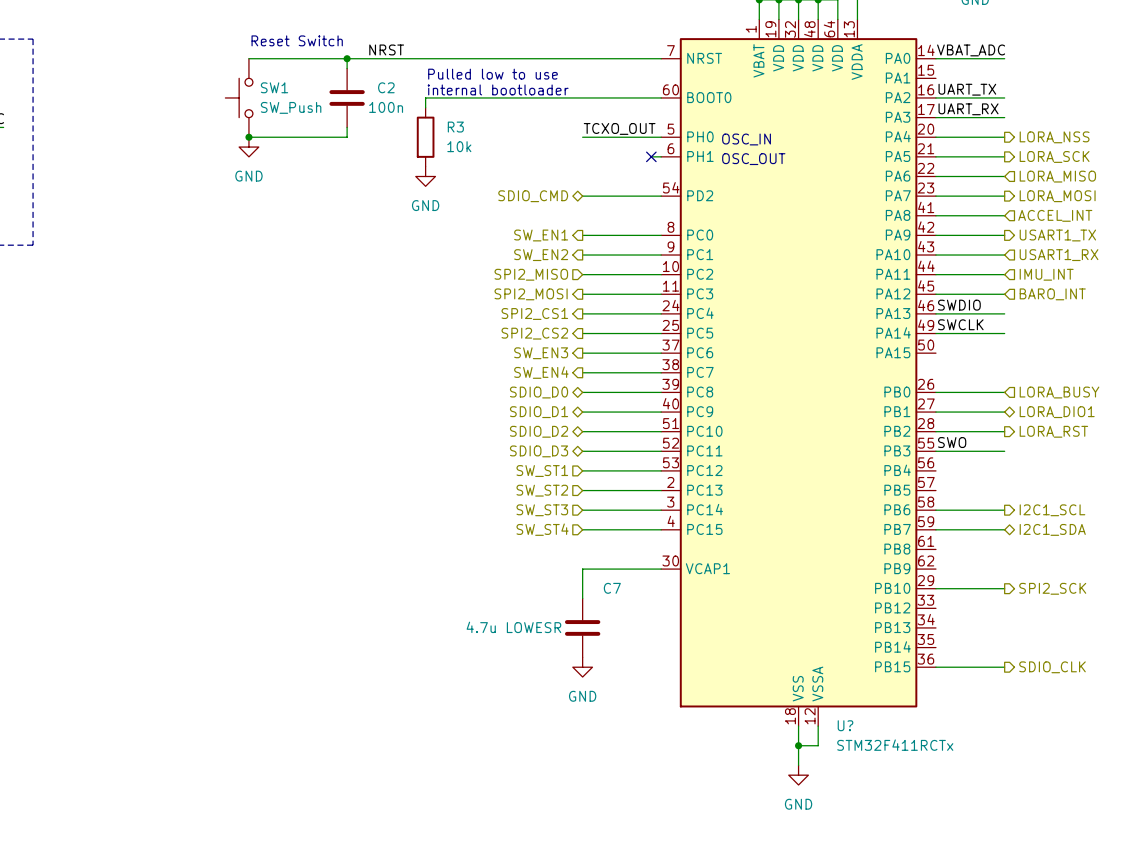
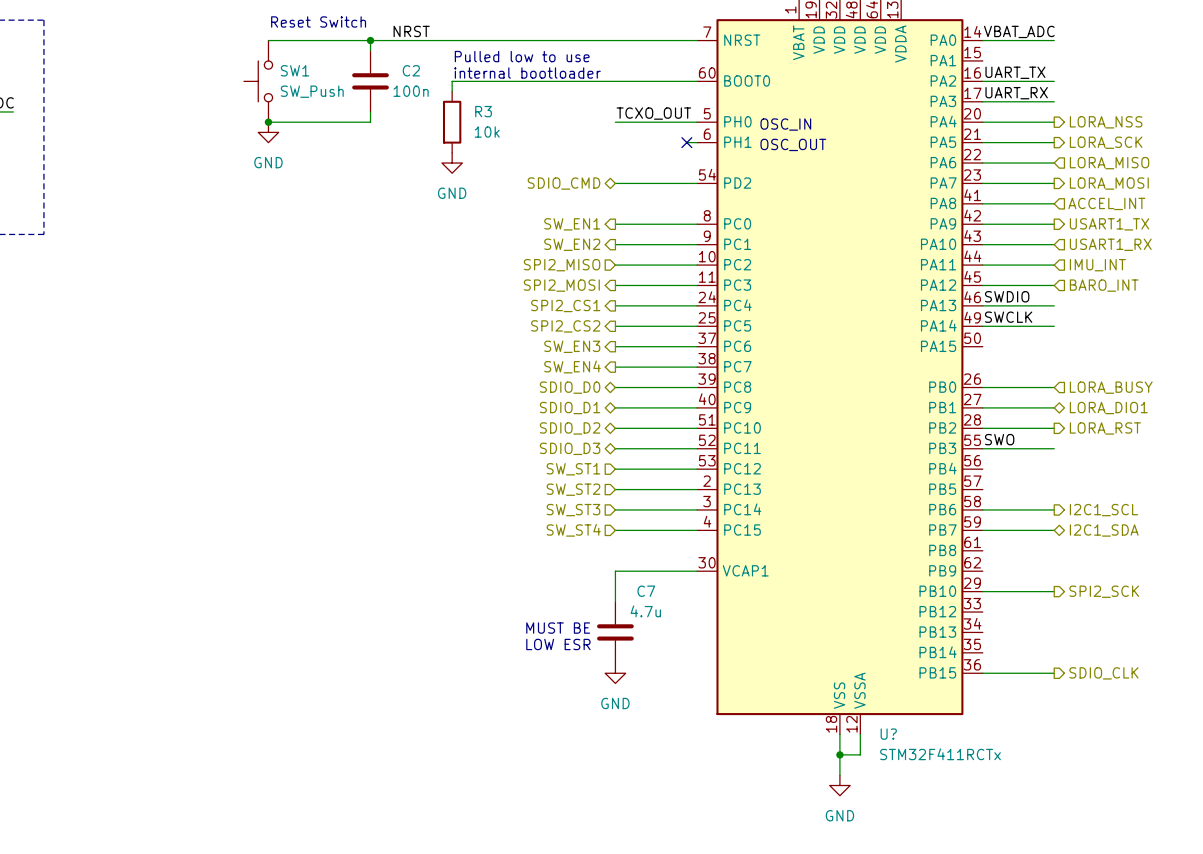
text: none -> MUST BE (558, 628)
C7 value: 4.7u LOWESR (513, 627) -> 4.7u (645, 611)
text: none -> LOW ESR (558, 644)

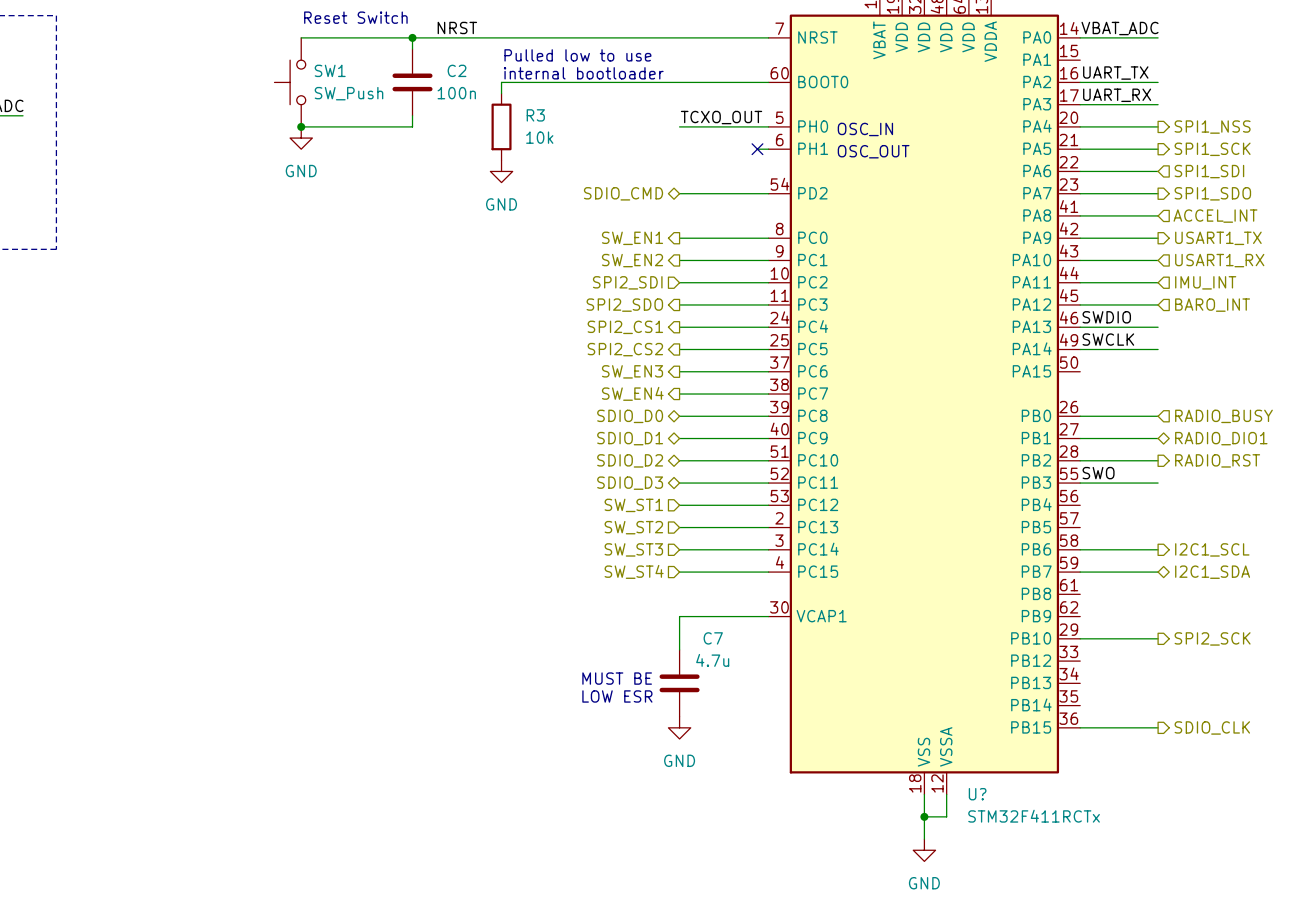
hierarchical label: LORA_NSS (1106, 122) -> SPI1_NSS (1212, 127)
hierarchical label: LORA_SCK (1106, 142) -> SPI1_SCK (1212, 149)
hierarchical label: LORA_MISO (1109, 163) -> SPI1_SDI (1209, 171)
hierarchical label: LORA_MOSI (1109, 183) -> SPI1_SDO (1212, 193)
hierarchical label: SPI2_MISO (562, 265) -> SPI2_SDI (627, 282)
hierarchical label: SPI2_MOSI (561, 285) -> SPI2_SDO (624, 305)
hierarchical label: LORA_BUSY (1111, 387) -> RADIO_BUSY (1223, 416)
hierarchical label: LORA_DIO1 (1108, 408) -> RADIO_DIO1 (1221, 438)
hierarchical label: LORA_RST (1105, 428) -> RADIO_RST (1217, 460)

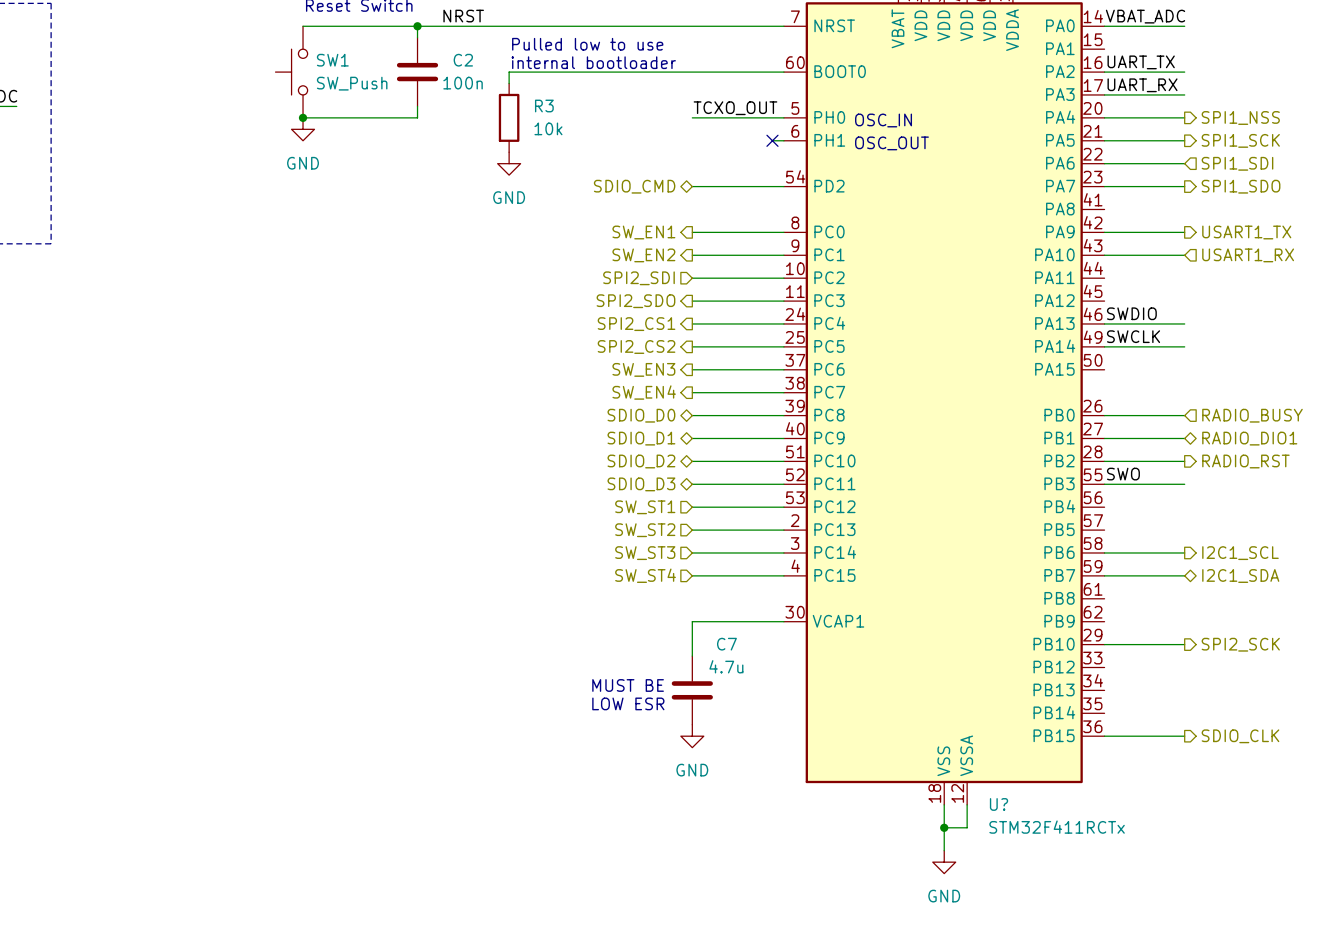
wire: (1080, 215) (1158, 215) -> none
hierarchical label: ACCEL_INT (1215, 216) -> none
wire: (1080, 282) (1158, 282) -> none
hierarchical label: IMU_INT (1205, 282) -> none
wire: (1080, 304) (1158, 304) -> none
hierarchical label: BARO_INT (1212, 305) -> none

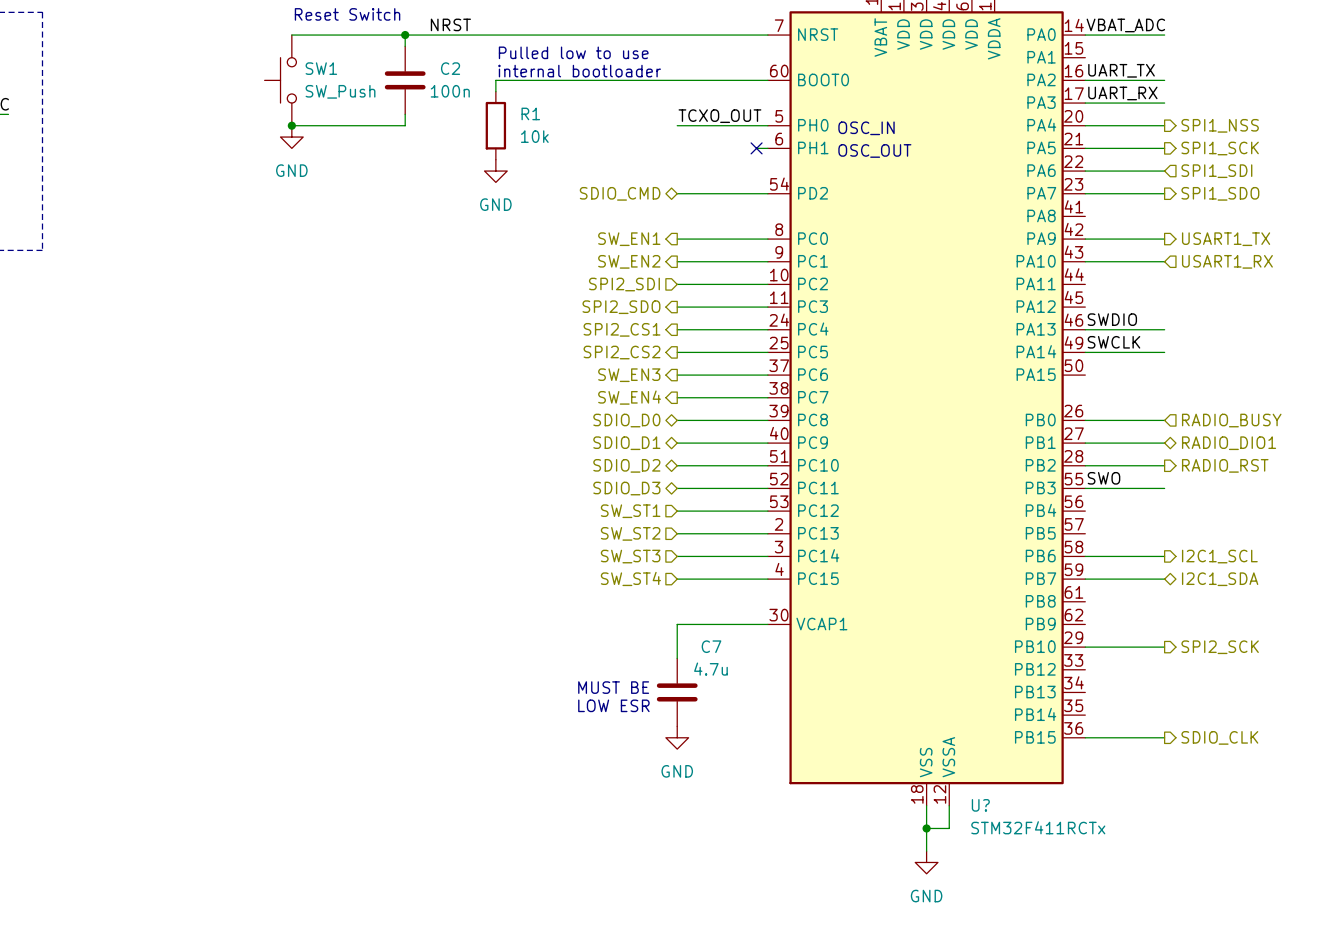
R3 name: R3 (544, 106) -> R1 (530, 113)

